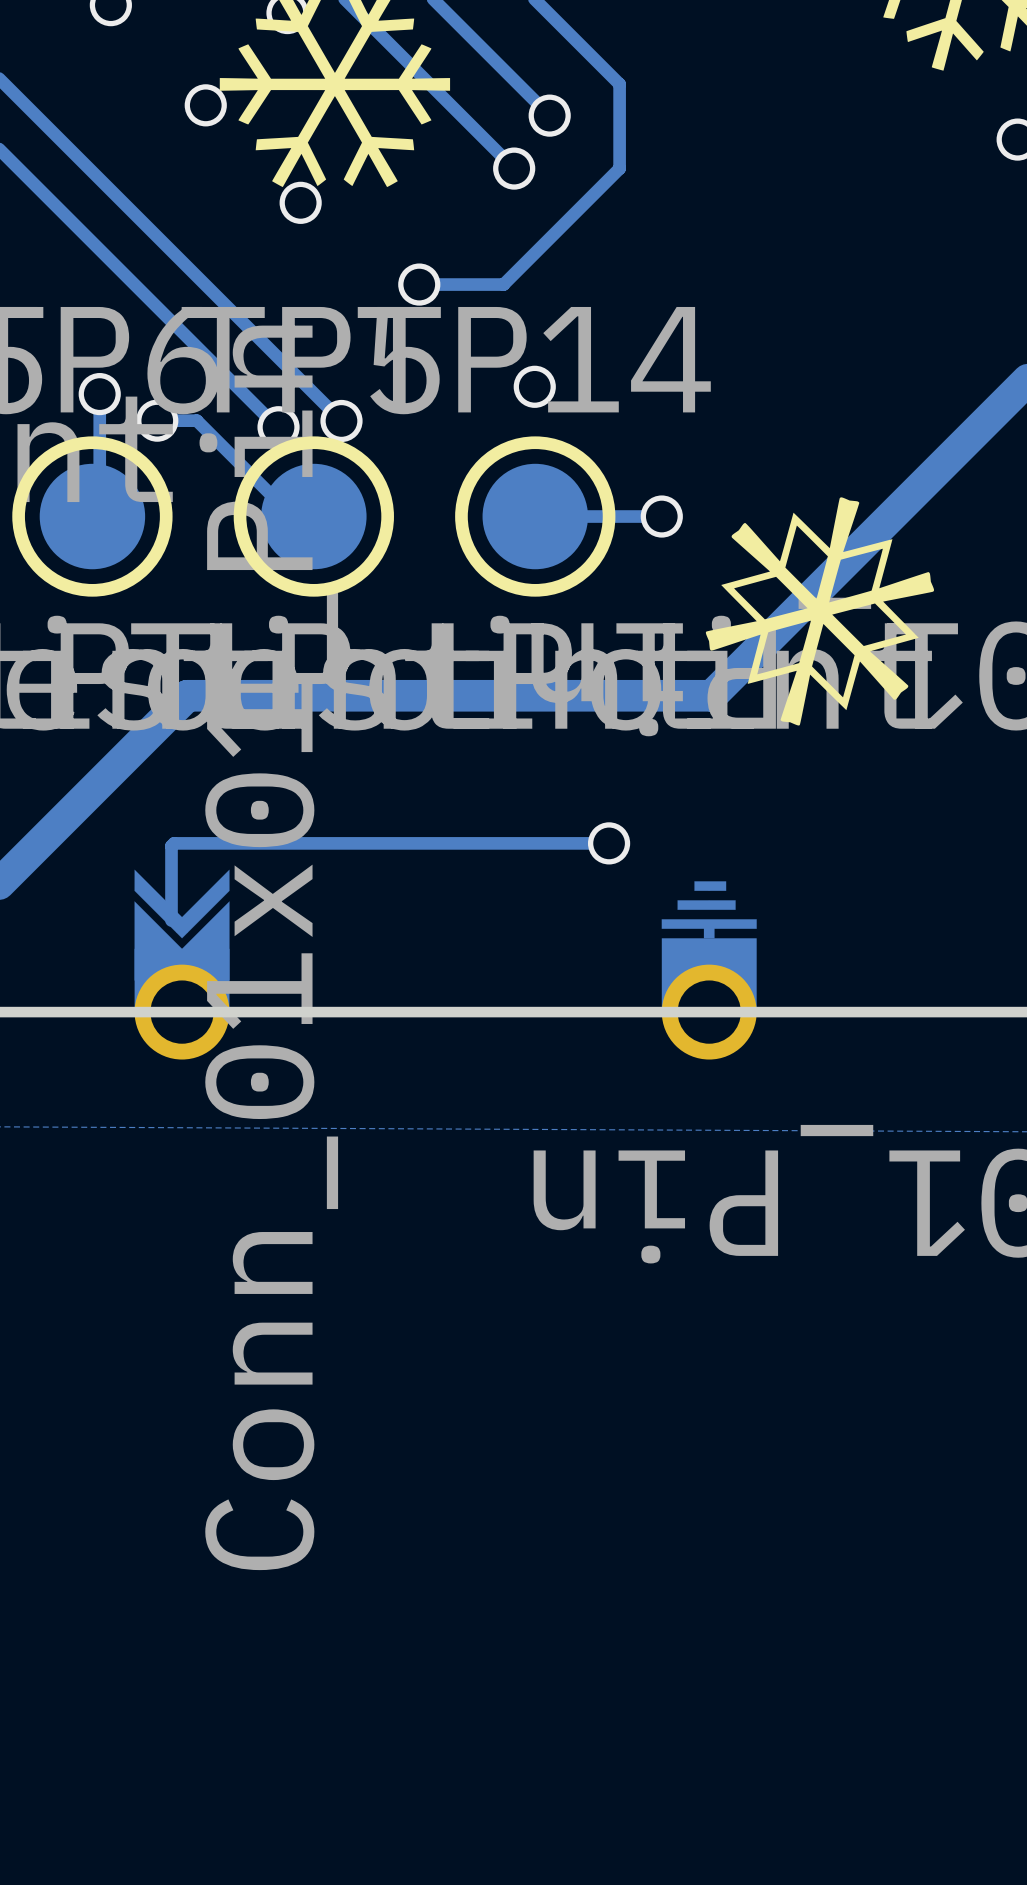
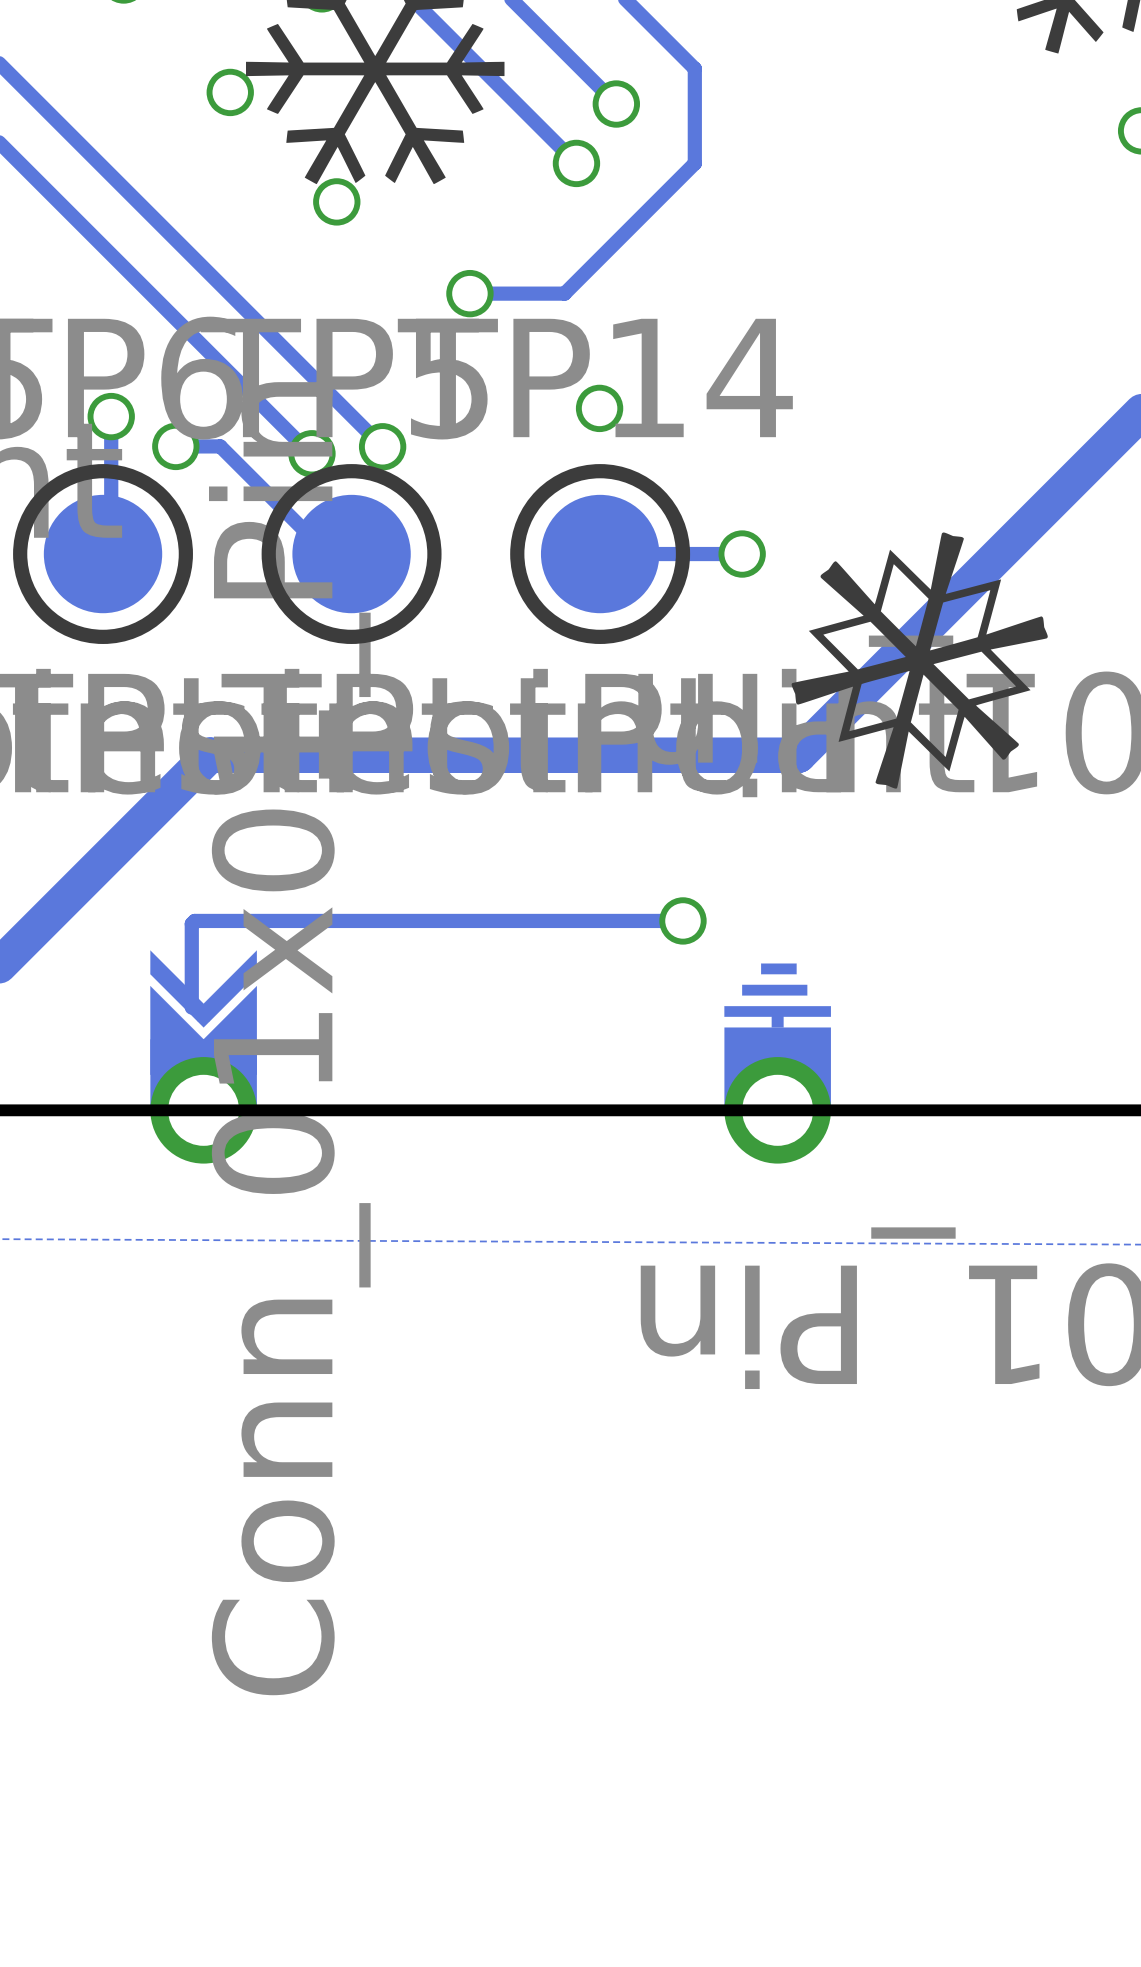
part position: (709, 970) -> (777, 1063)

